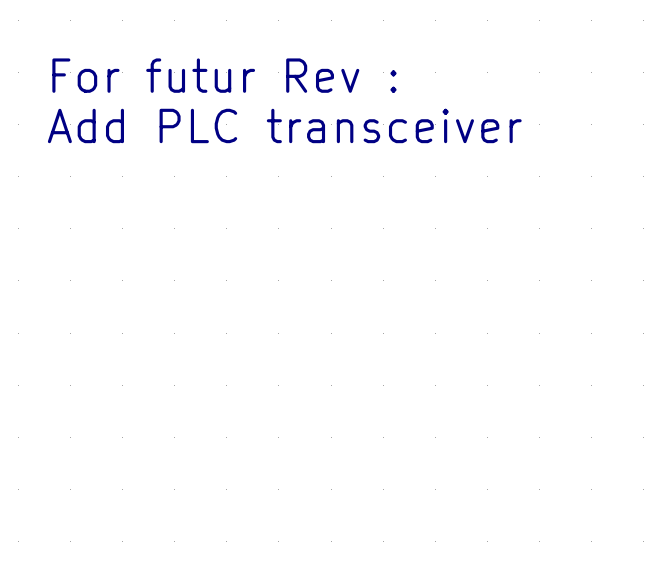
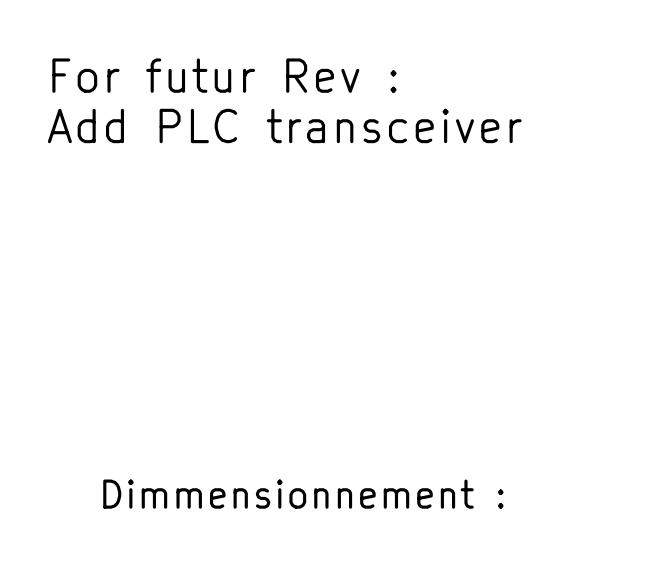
text: none -> Dimmensionnement : (303, 494)

